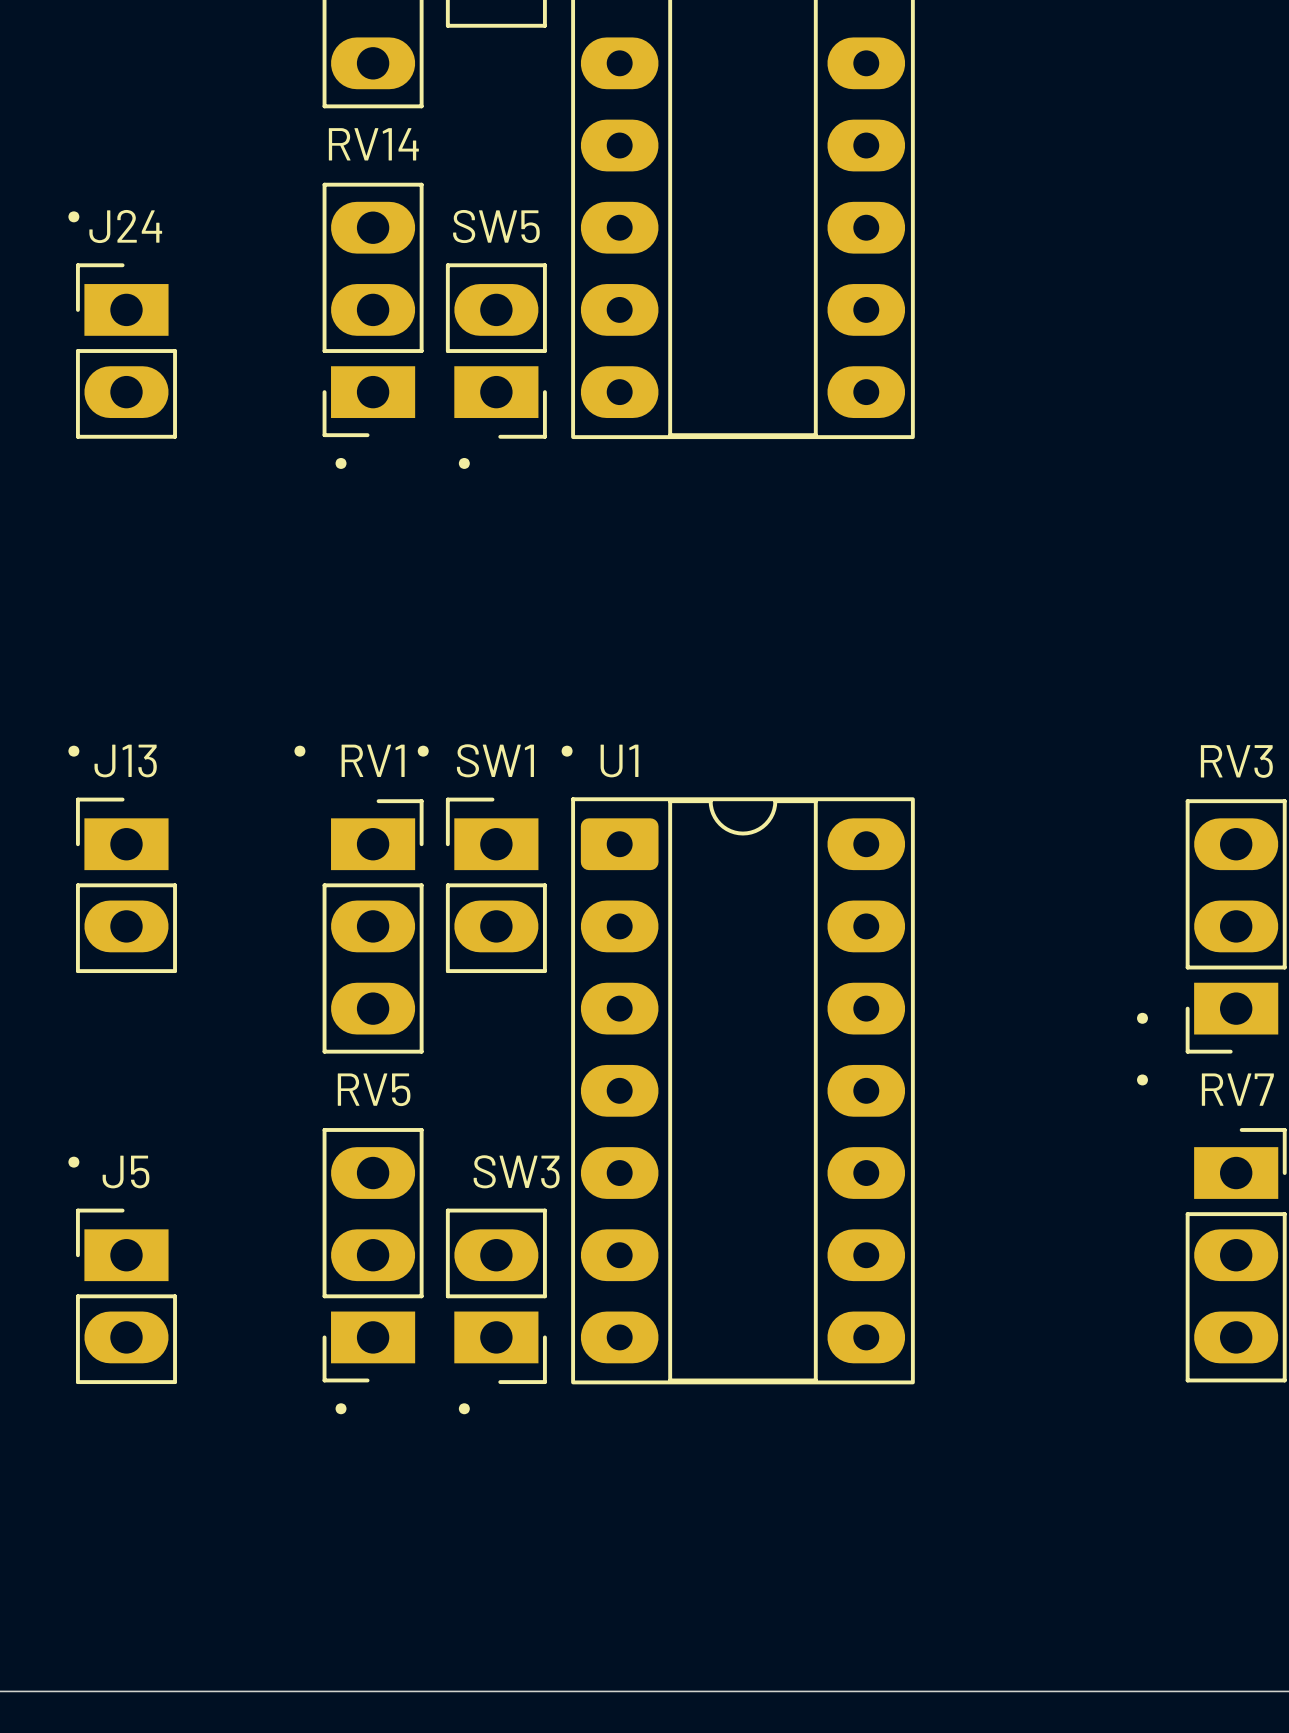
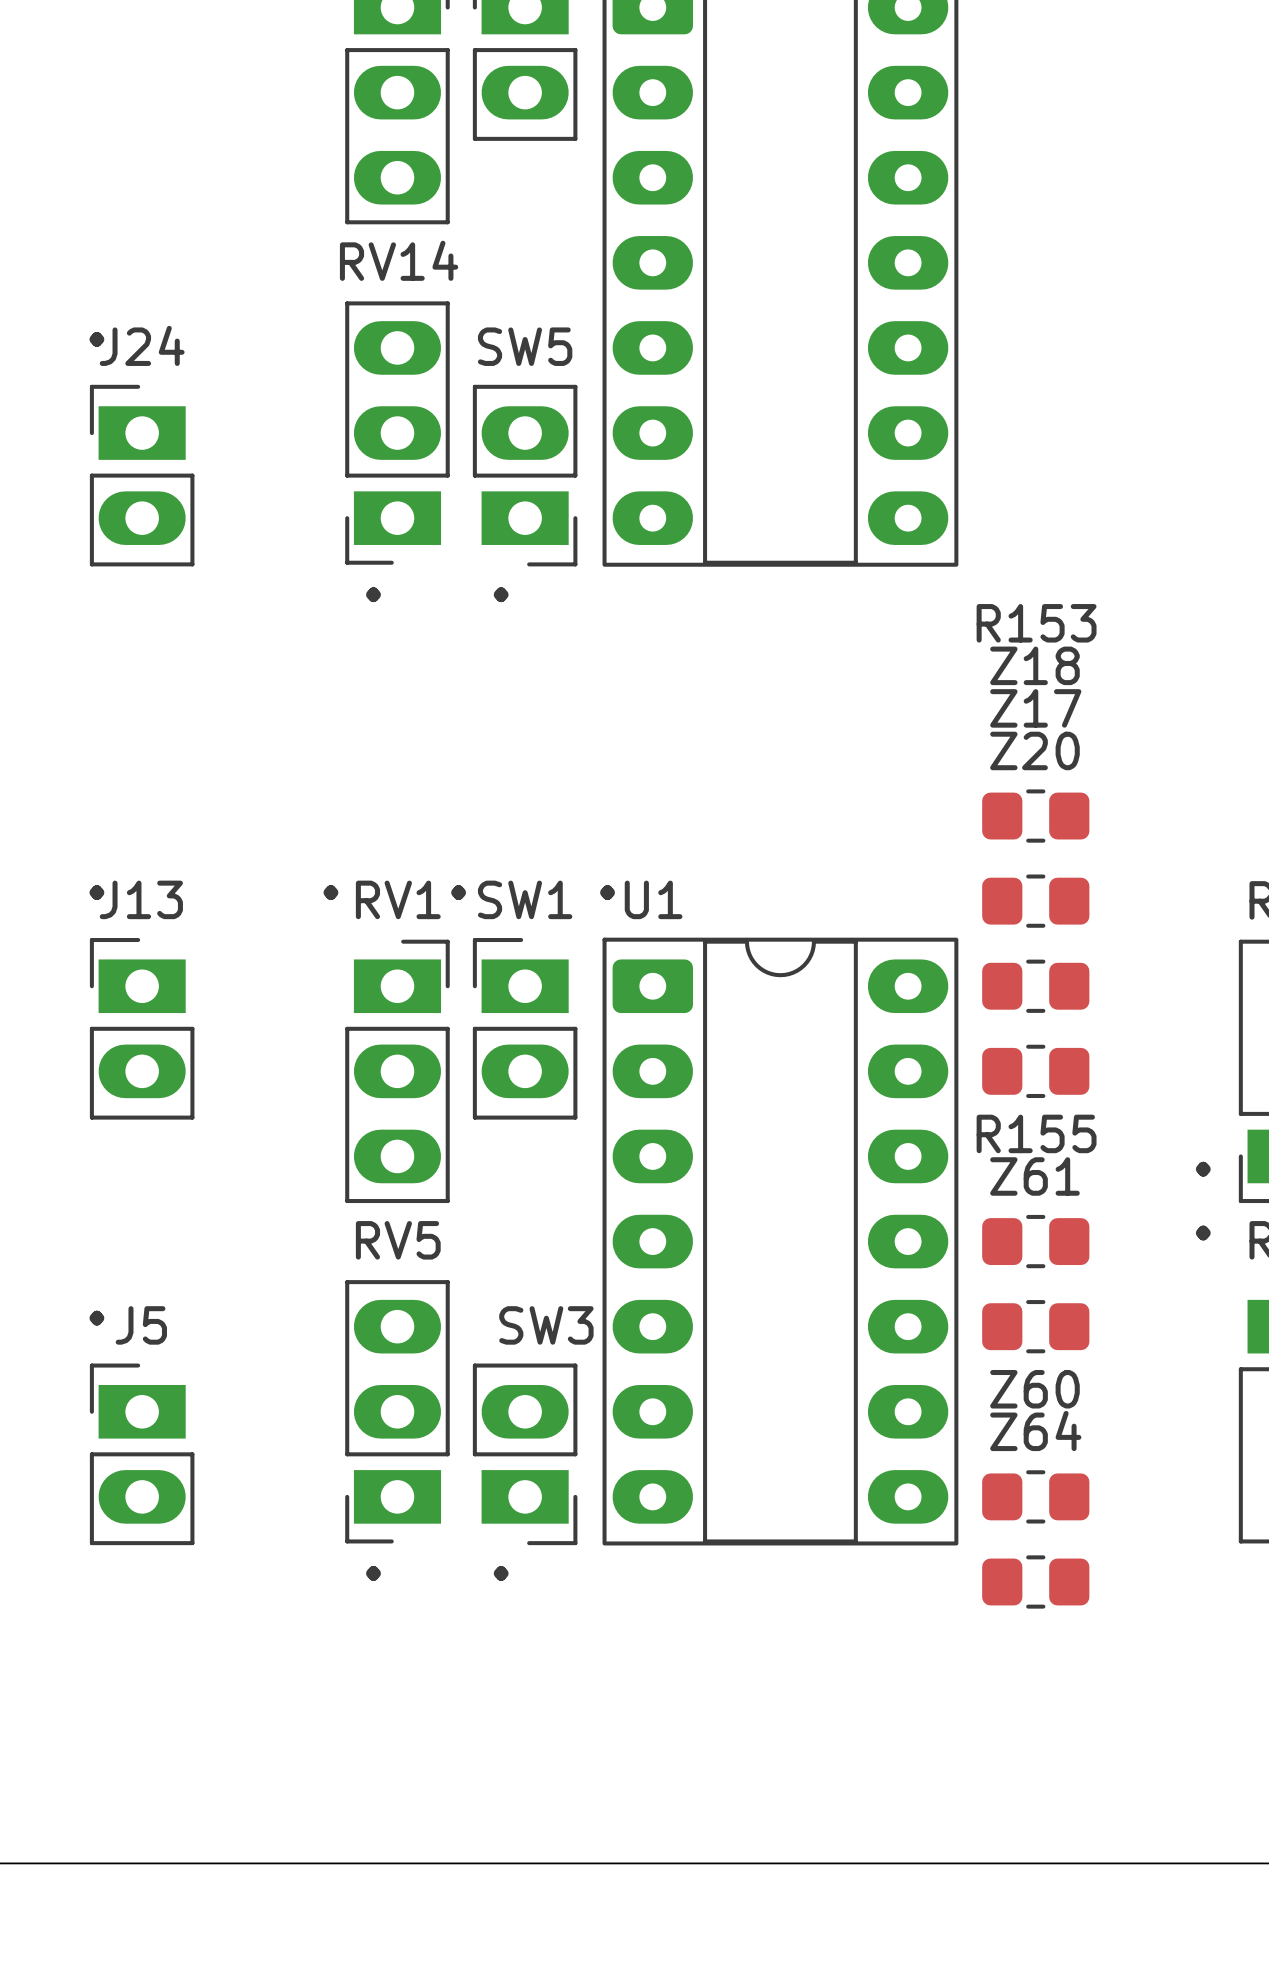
R153: none -> (1035, 816)
Z18: none -> (1035, 901)
Z17: none -> (1035, 986)
Z20: none -> (1035, 1071)
R155: none -> (1035, 1241)
Z61: none -> (1035, 1326)
Z60: none -> (1035, 1496)
Z64: none -> (1035, 1581)

